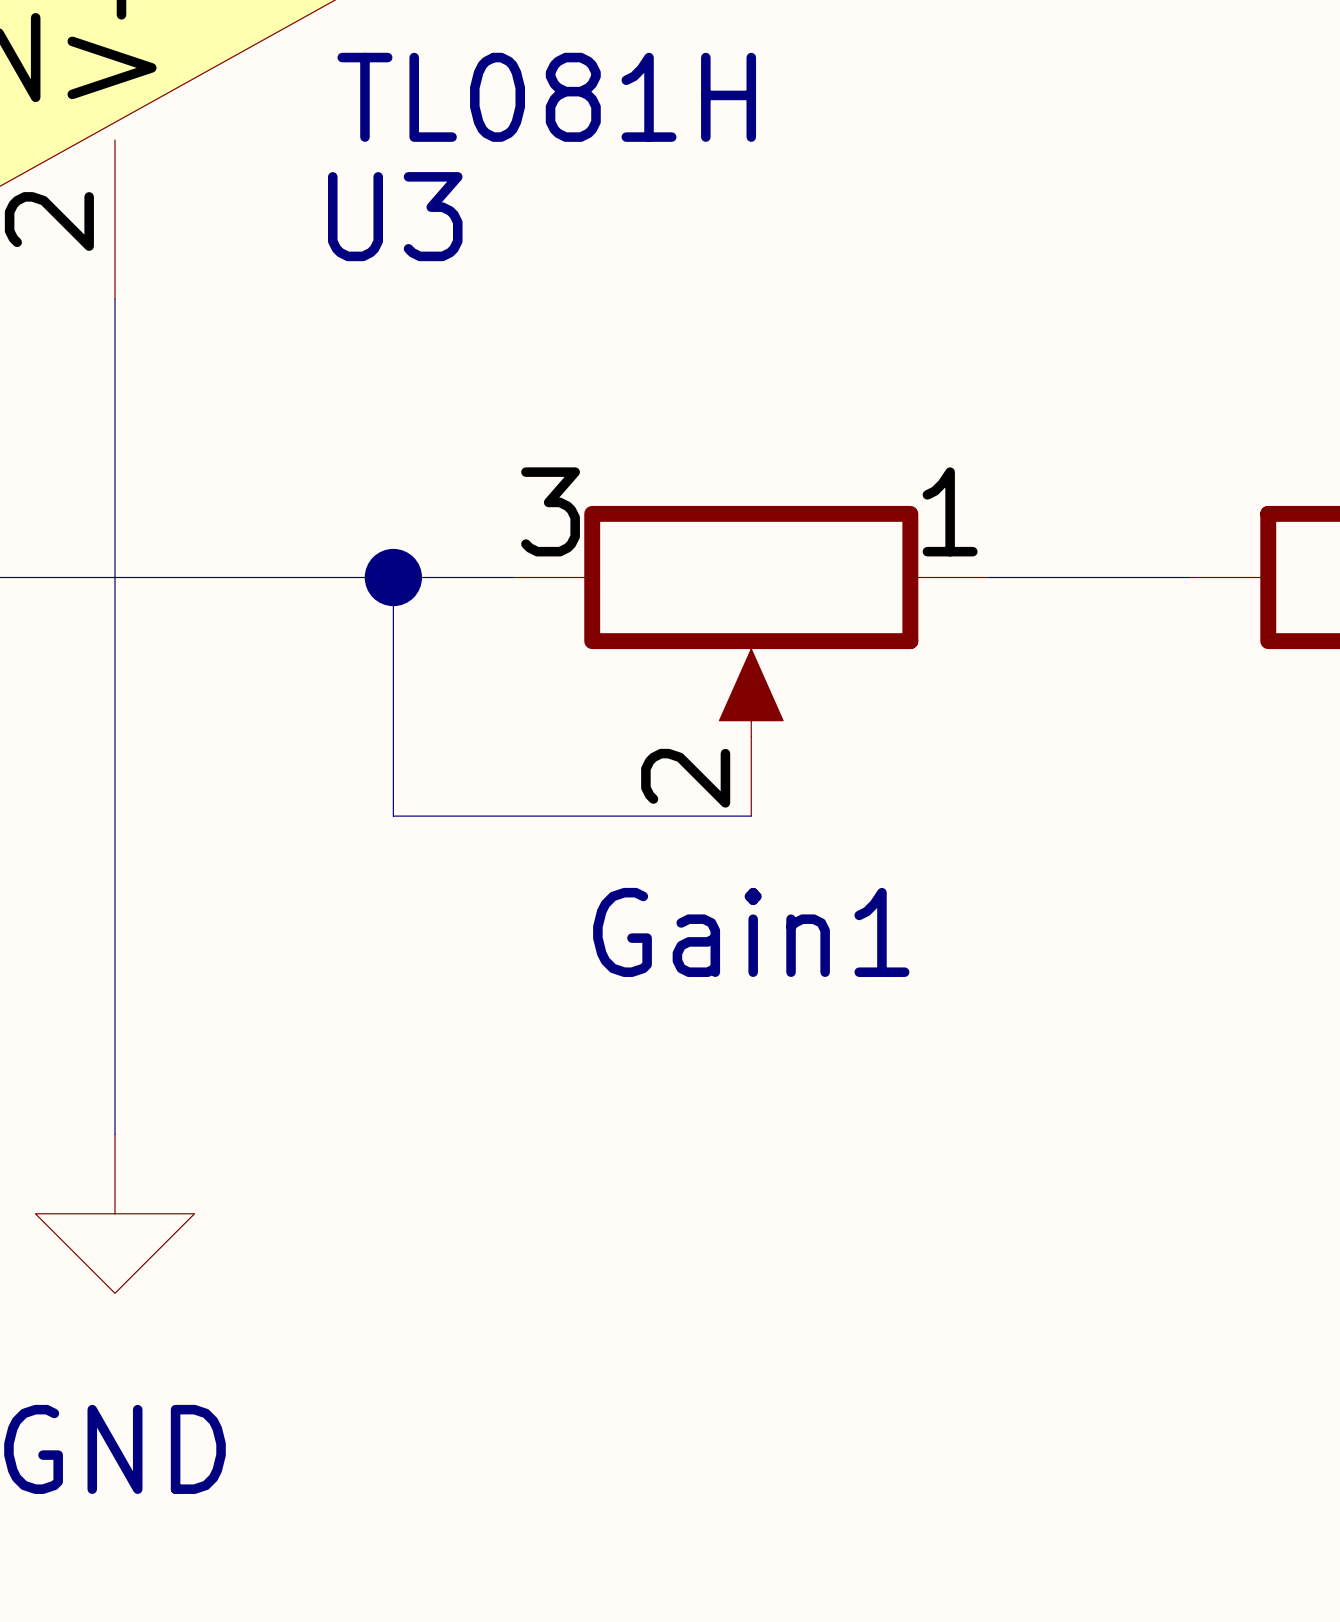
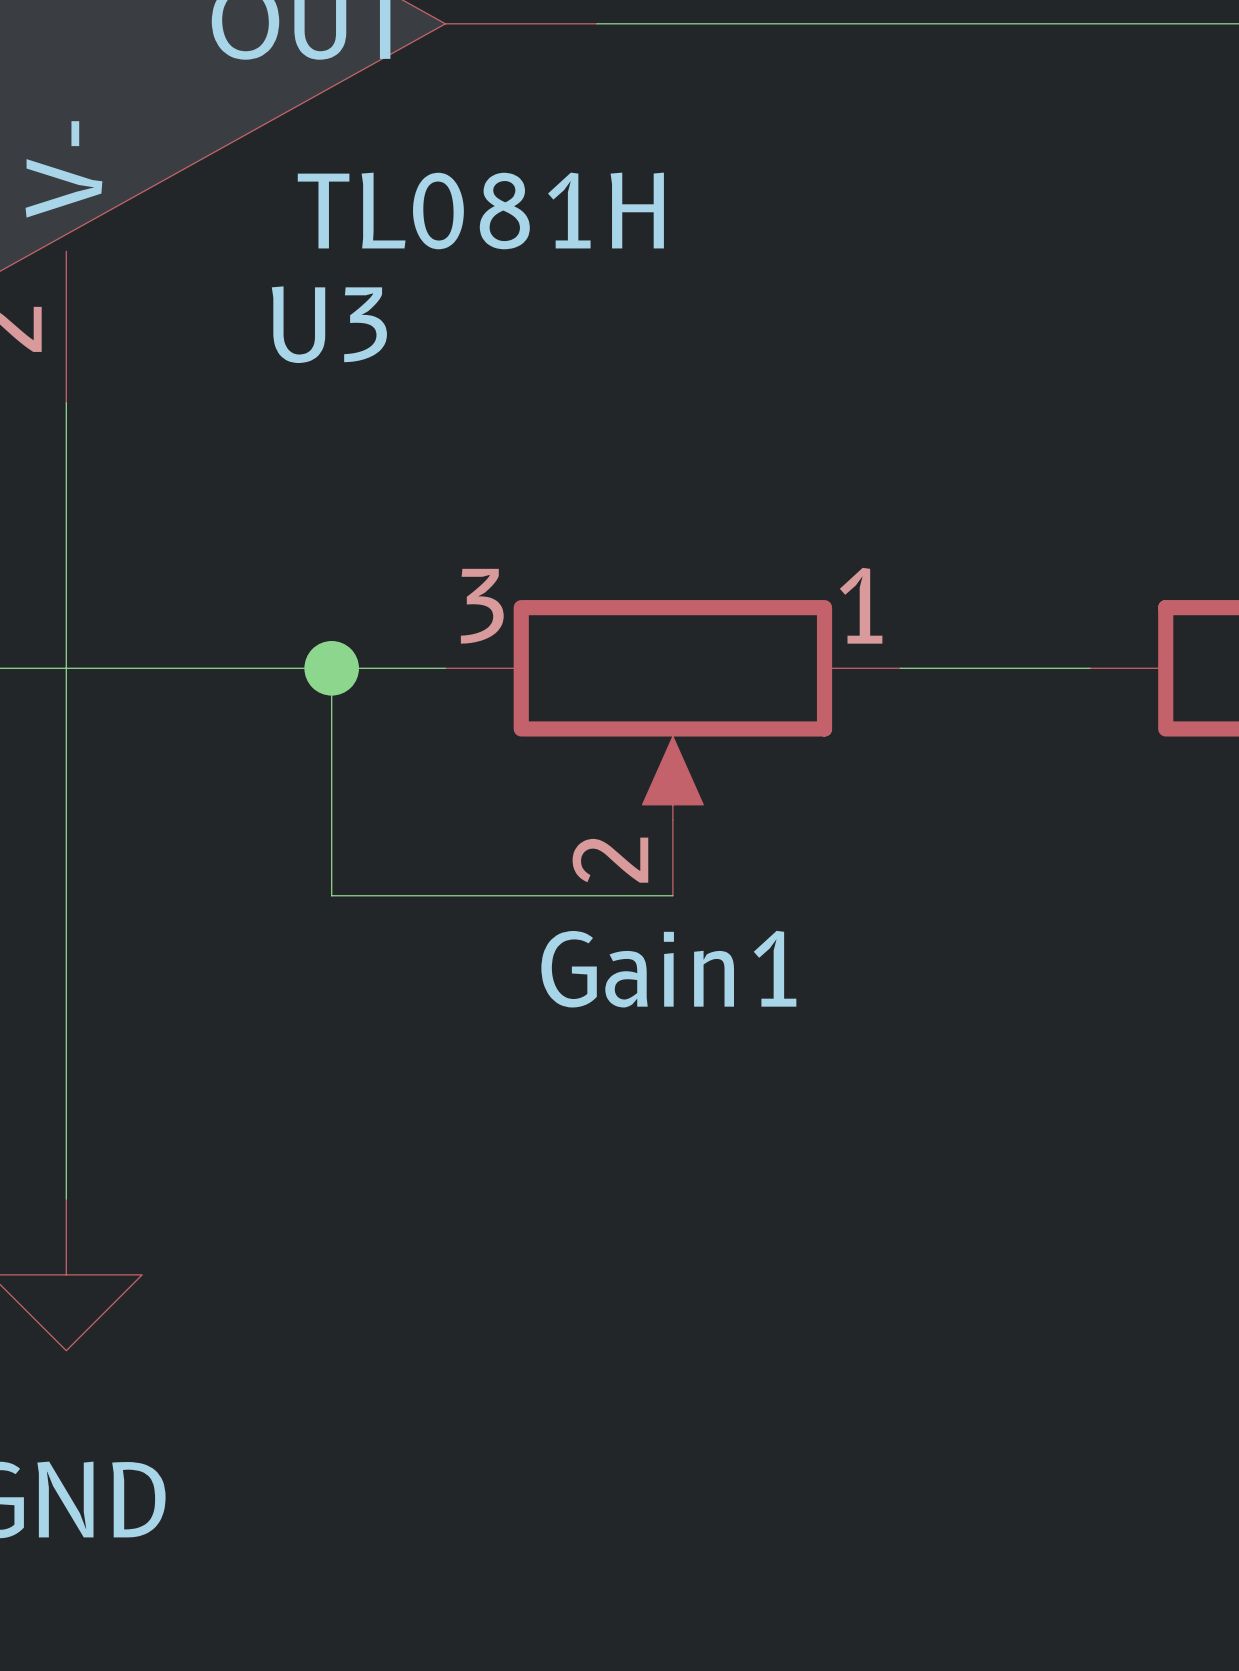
Gain1 name position: Gain1 (751, 932) -> Gain1 (668, 969)

